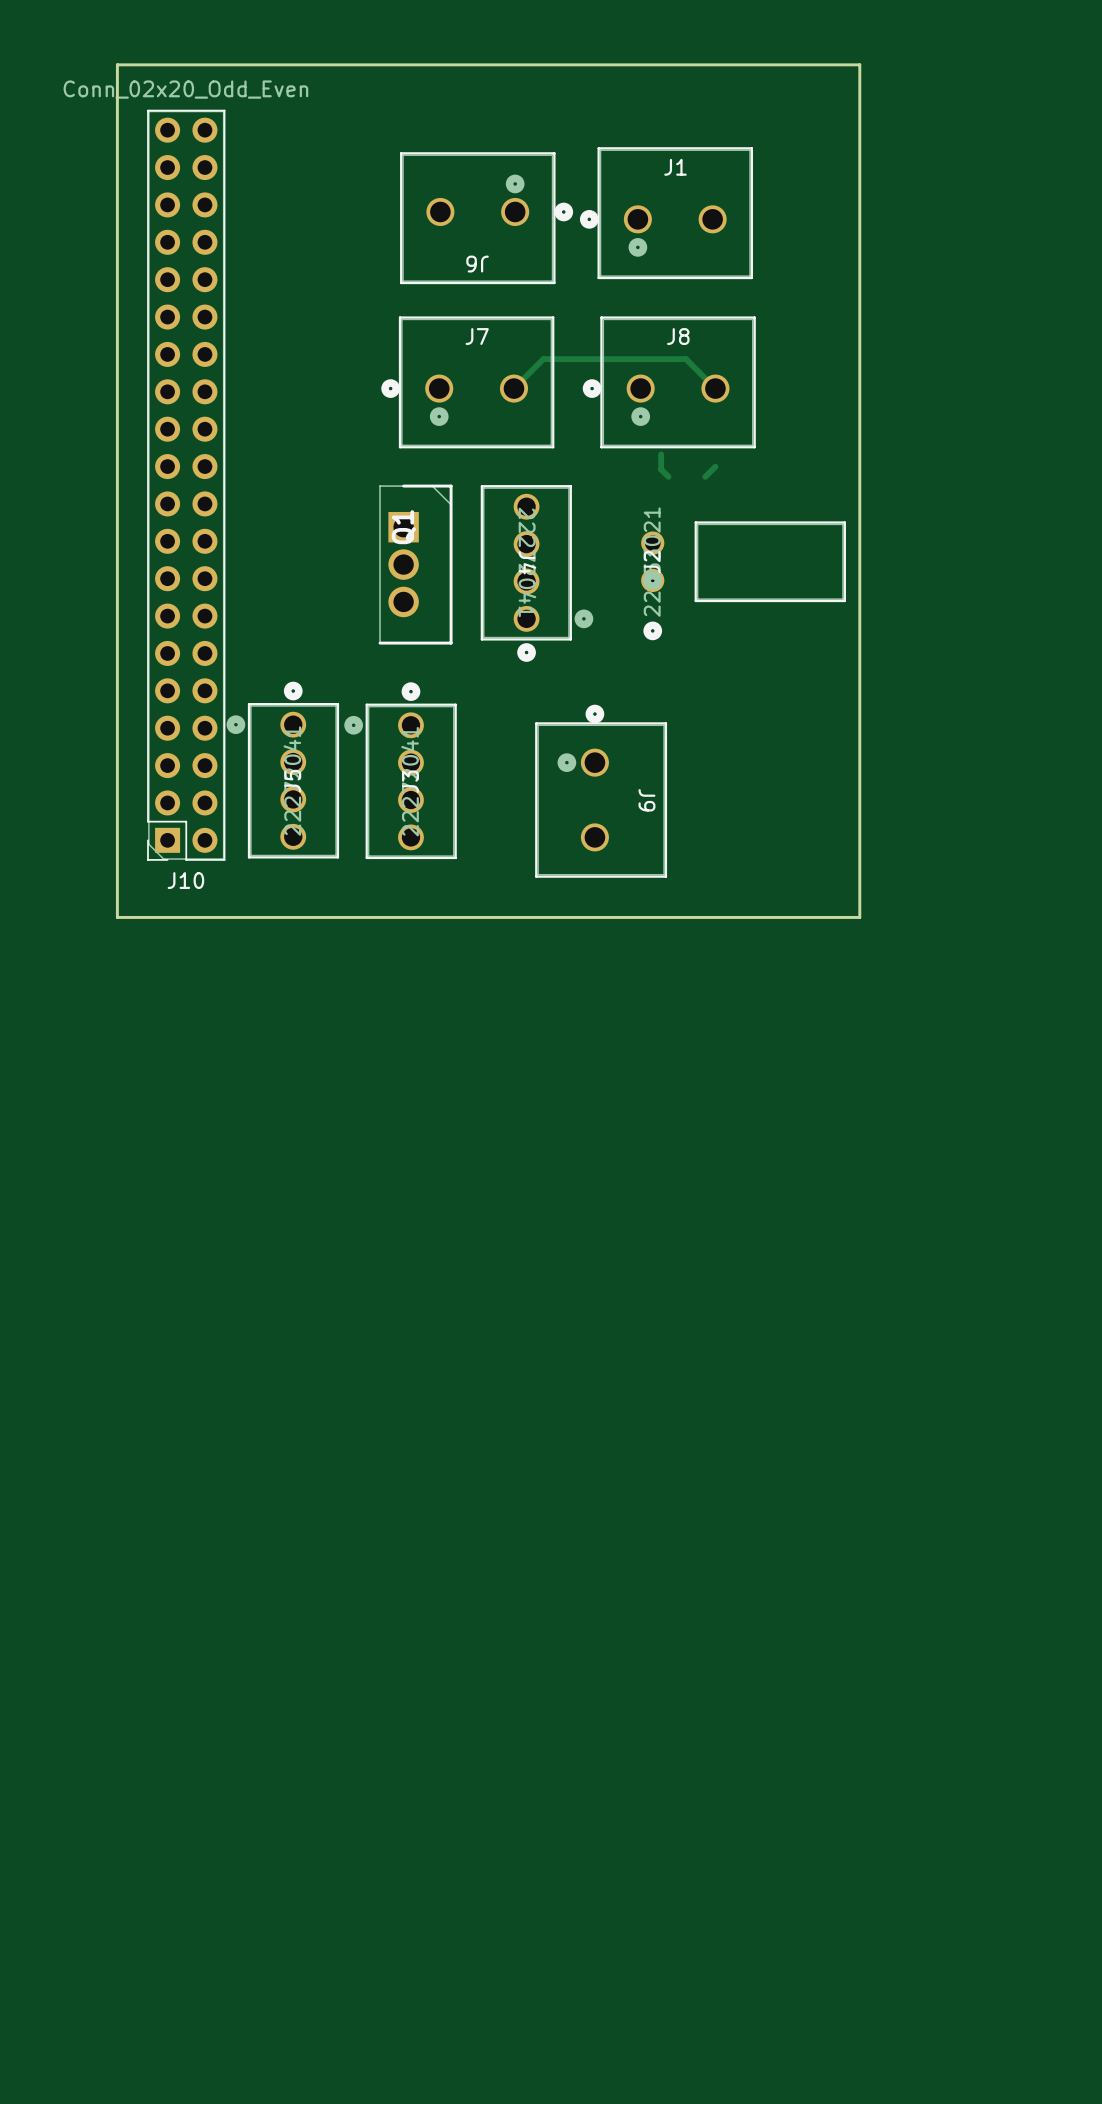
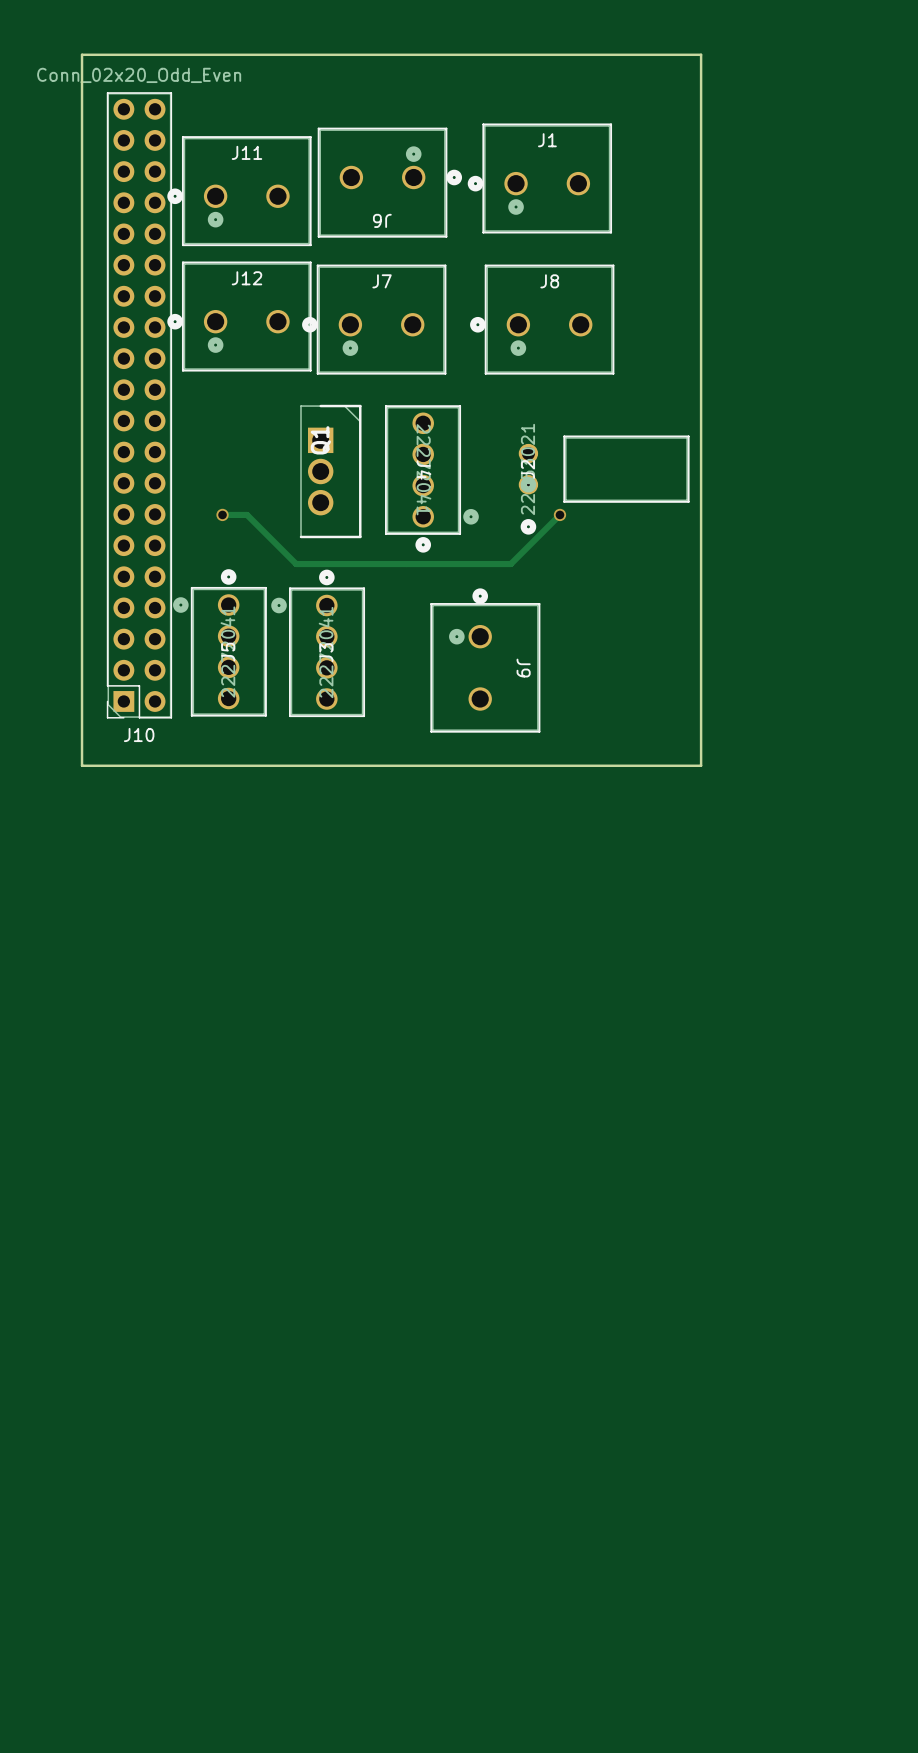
J11: none -> (239, 191)
J12: none -> (239, 316)
track: (513, 388) (543, 359) (686, 359) (715, 388) -> none
track: (661, 454) (661, 469) (668, 476) -> none
track: (715, 466) (705, 476) -> none
track: none -> (222, 514) (247, 514) (296, 564) (510, 564) (559, 514)
via: none -> (222, 514)
via: none -> (559, 514)

